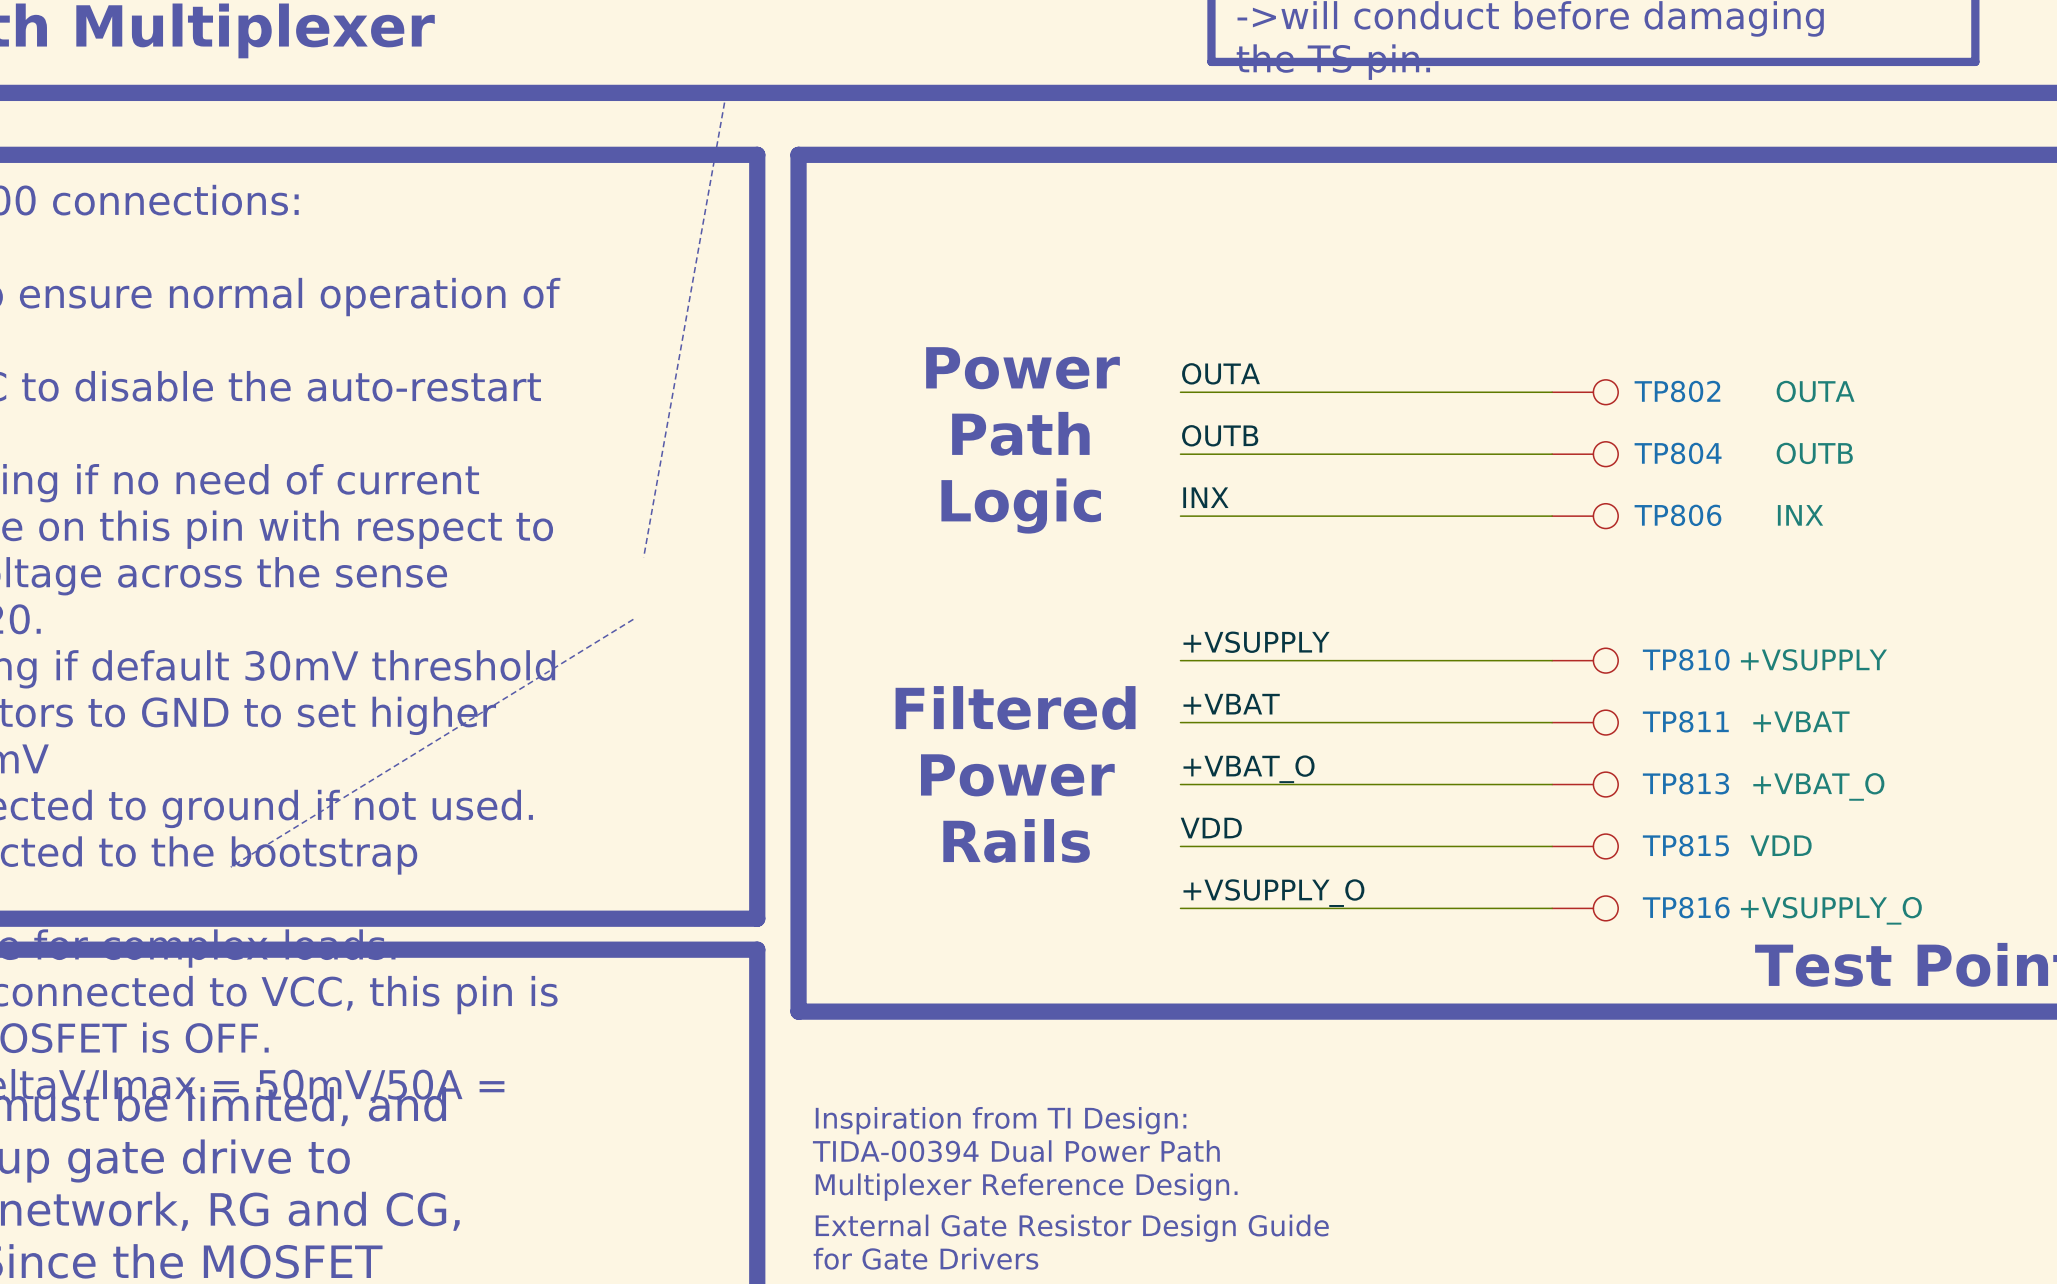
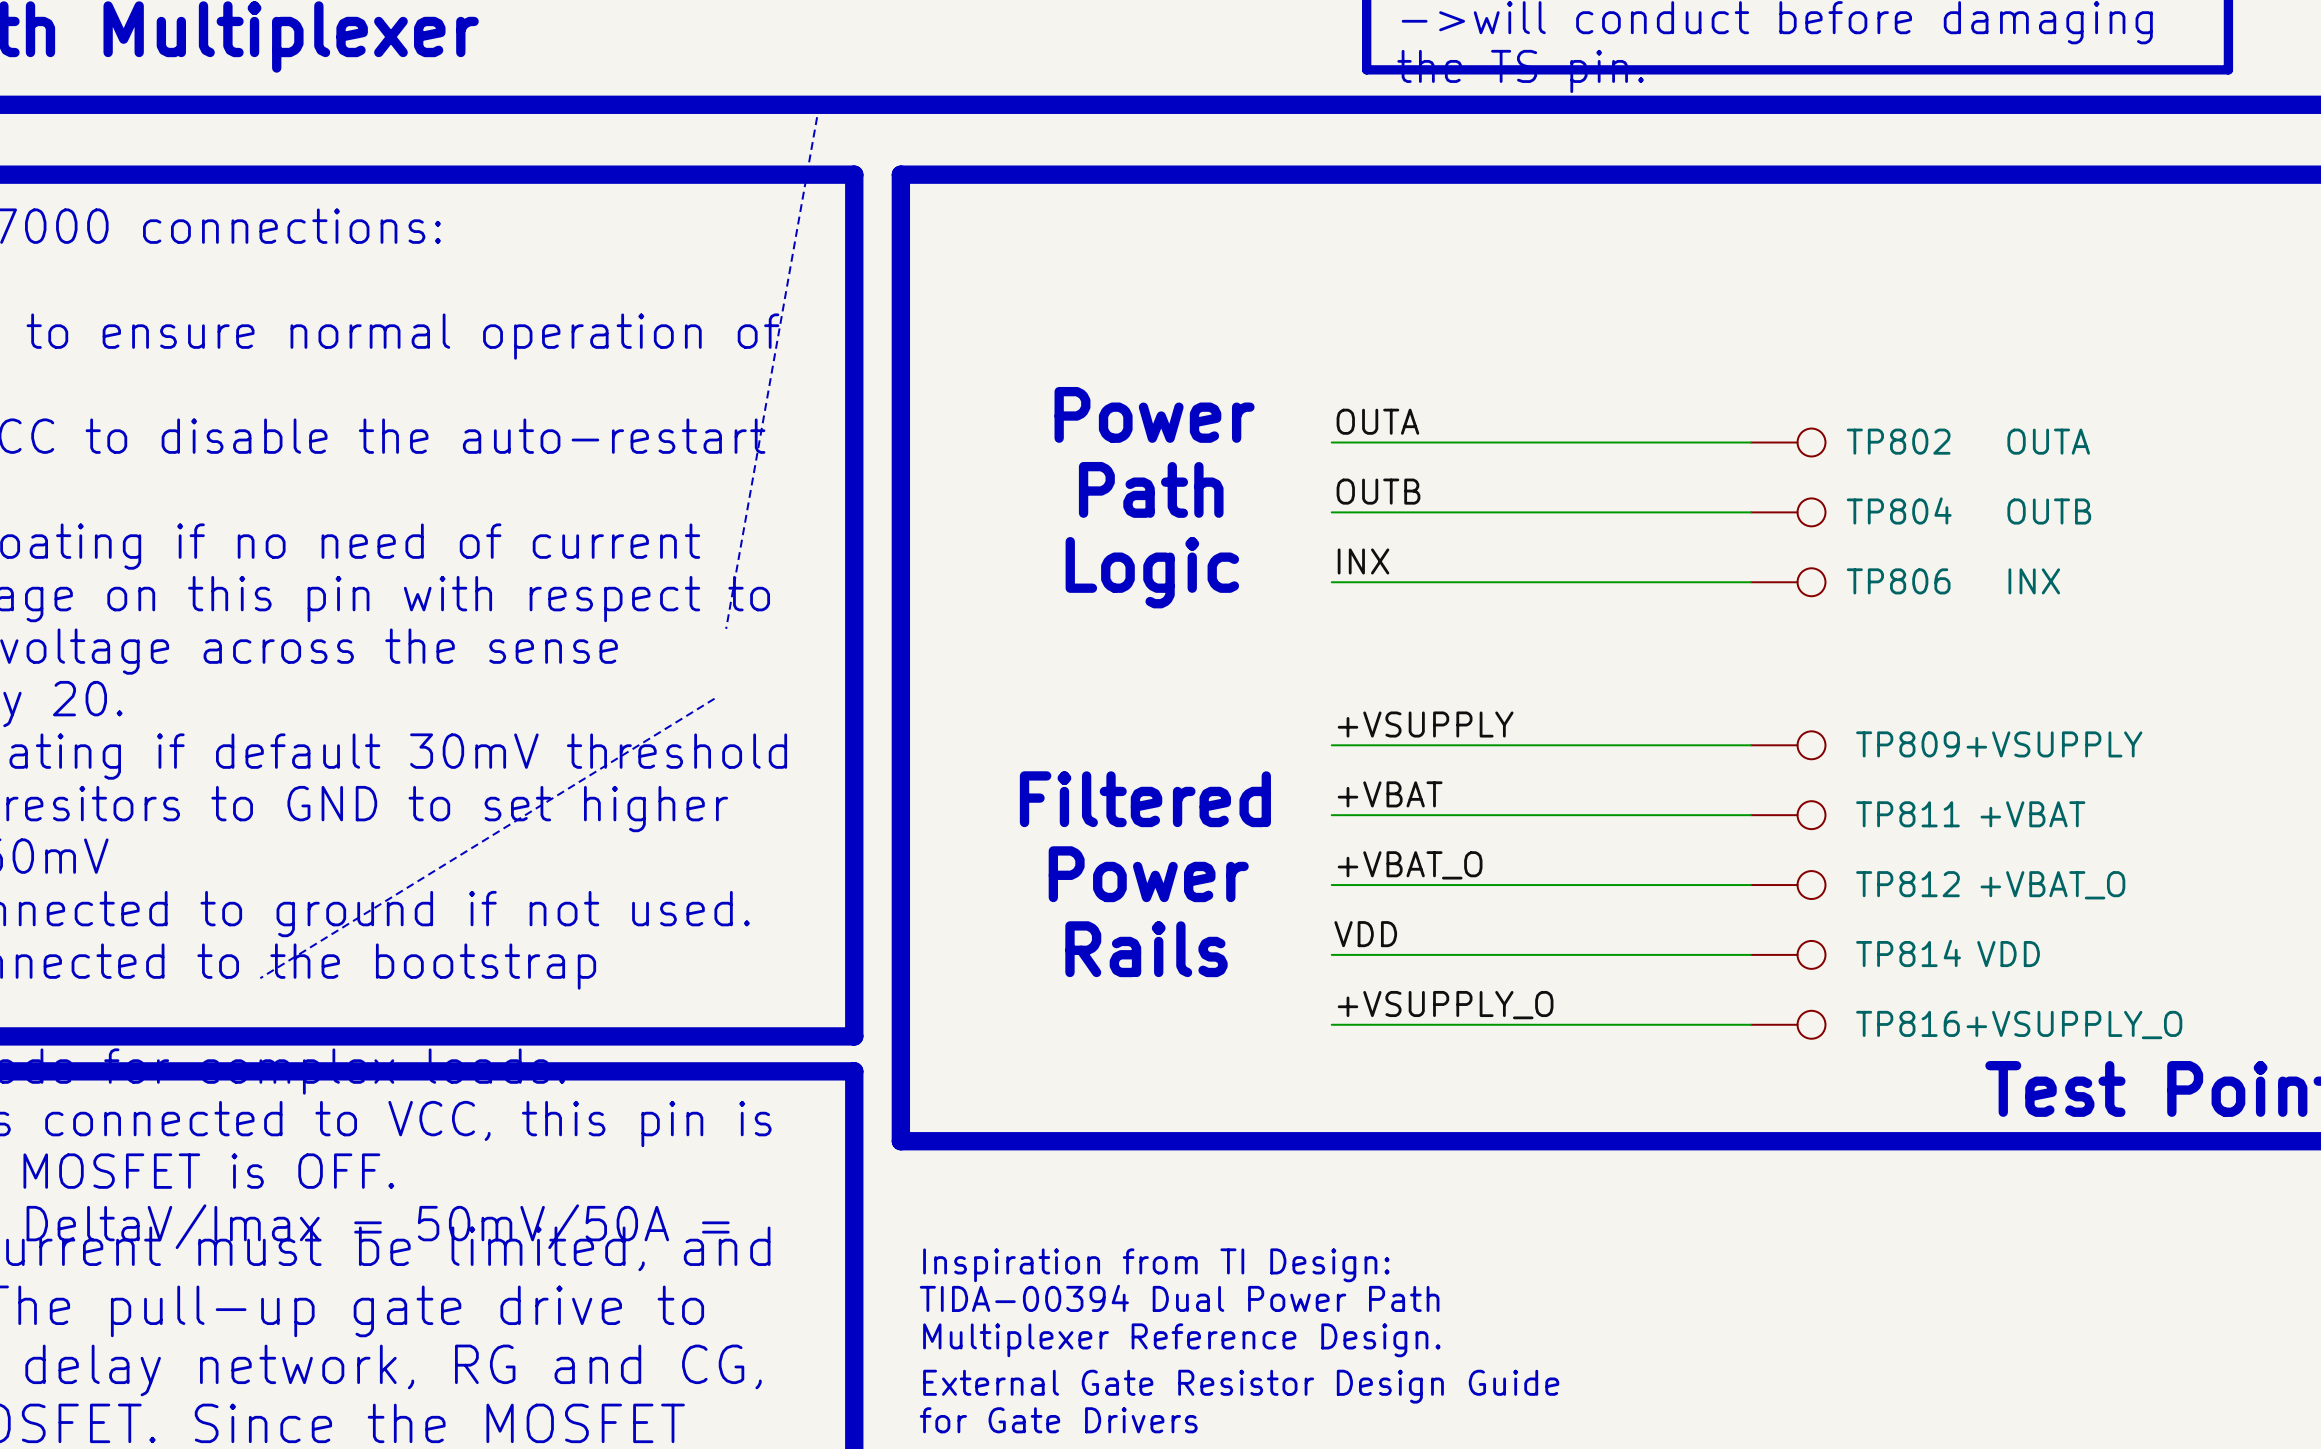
TP810 name: TP810 (1686, 659) -> TP809 (1907, 744)
TP813 name: TP813 (1685, 783) -> TP812 (1907, 884)
TP815 name: TP815 (1685, 845) -> TP814 (1908, 953)

